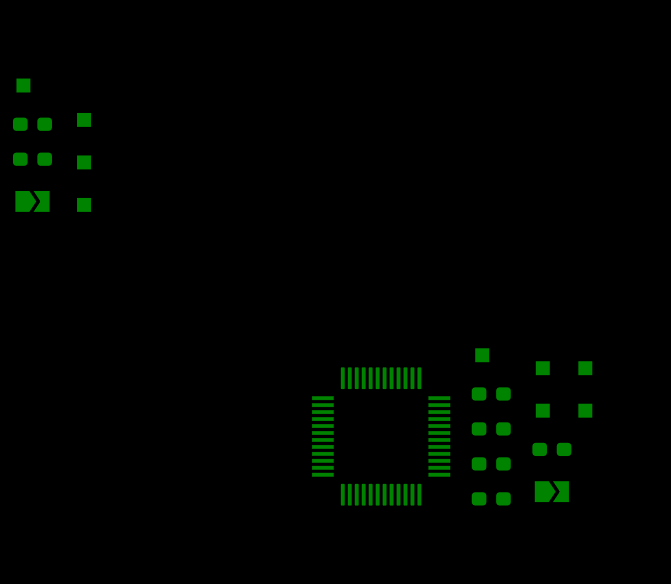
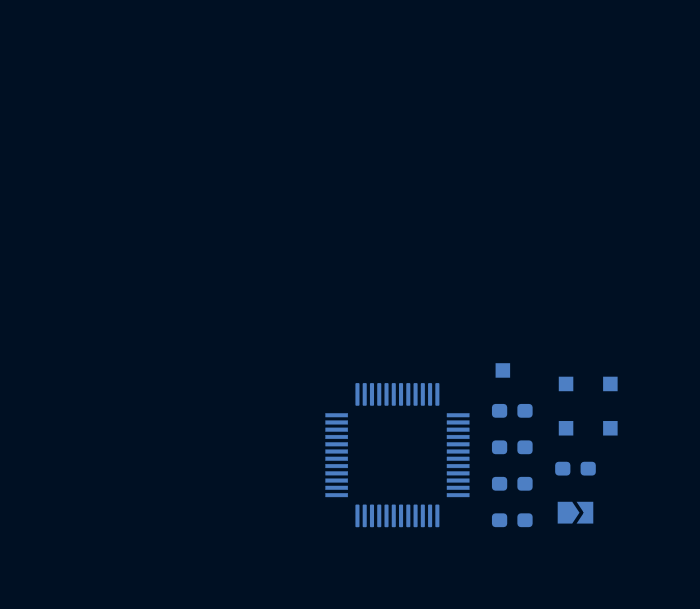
part: (23, 85) -> none
part: (84, 119) -> none
part: (32, 124) -> none
part: (32, 159) -> none
part: (84, 162) -> none
part: (32, 201) -> none
part: (84, 204) -> none

